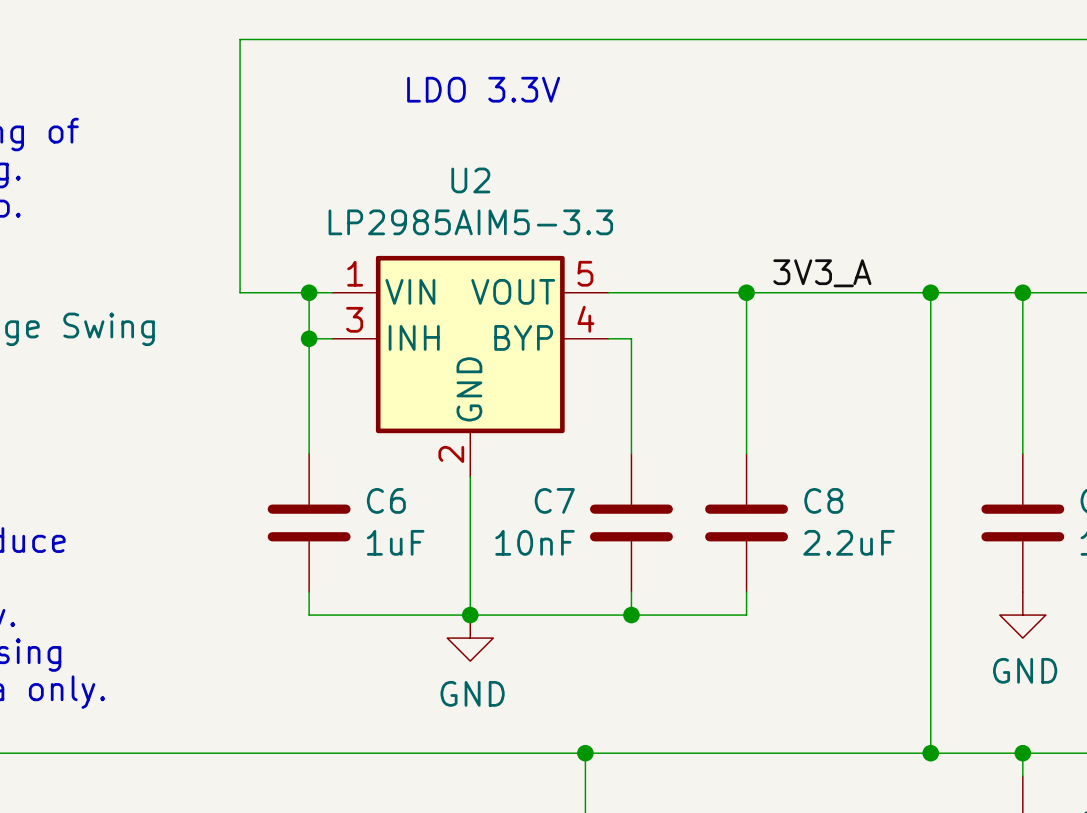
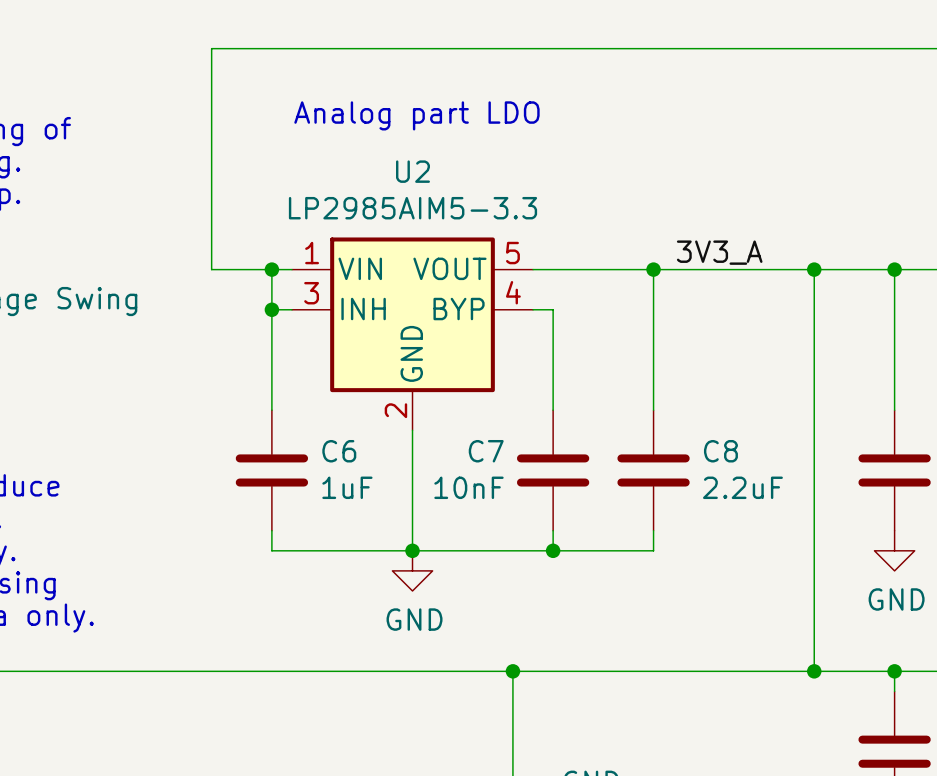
text: LDO 3.3V (483, 89) -> none
text: none -> Analog part LDO (416, 115)

